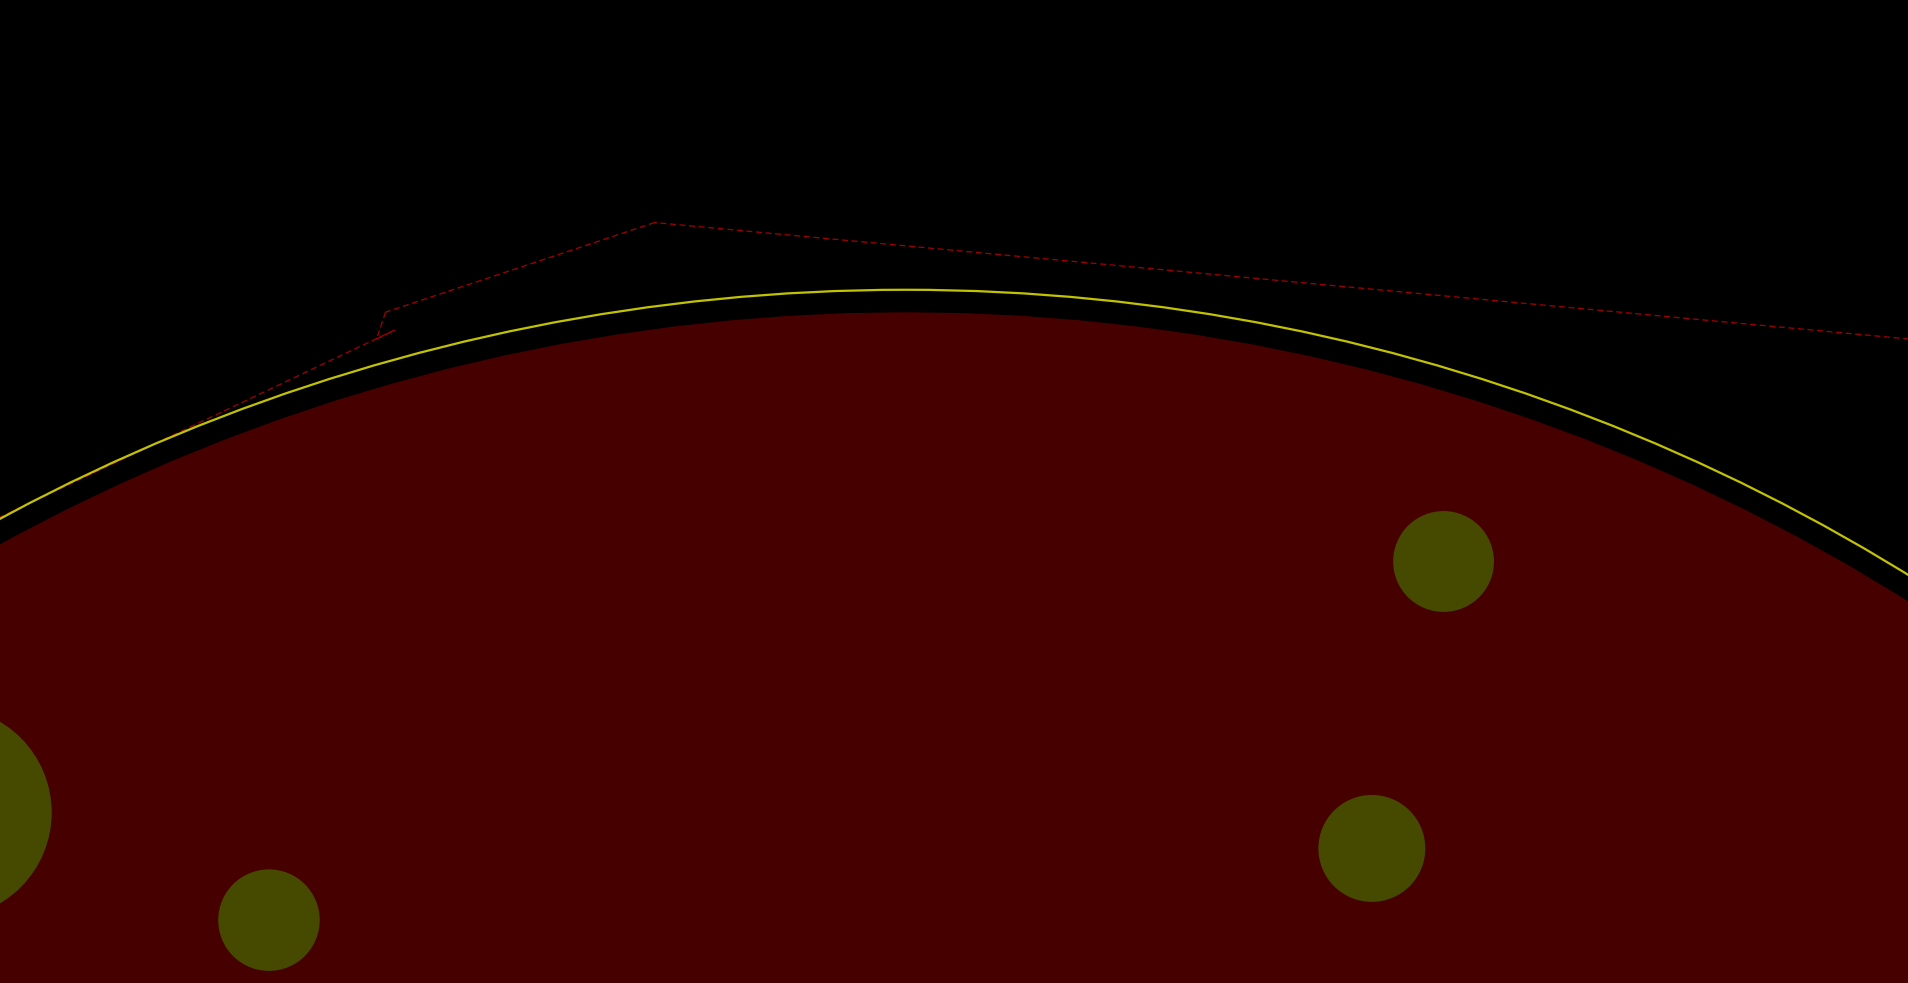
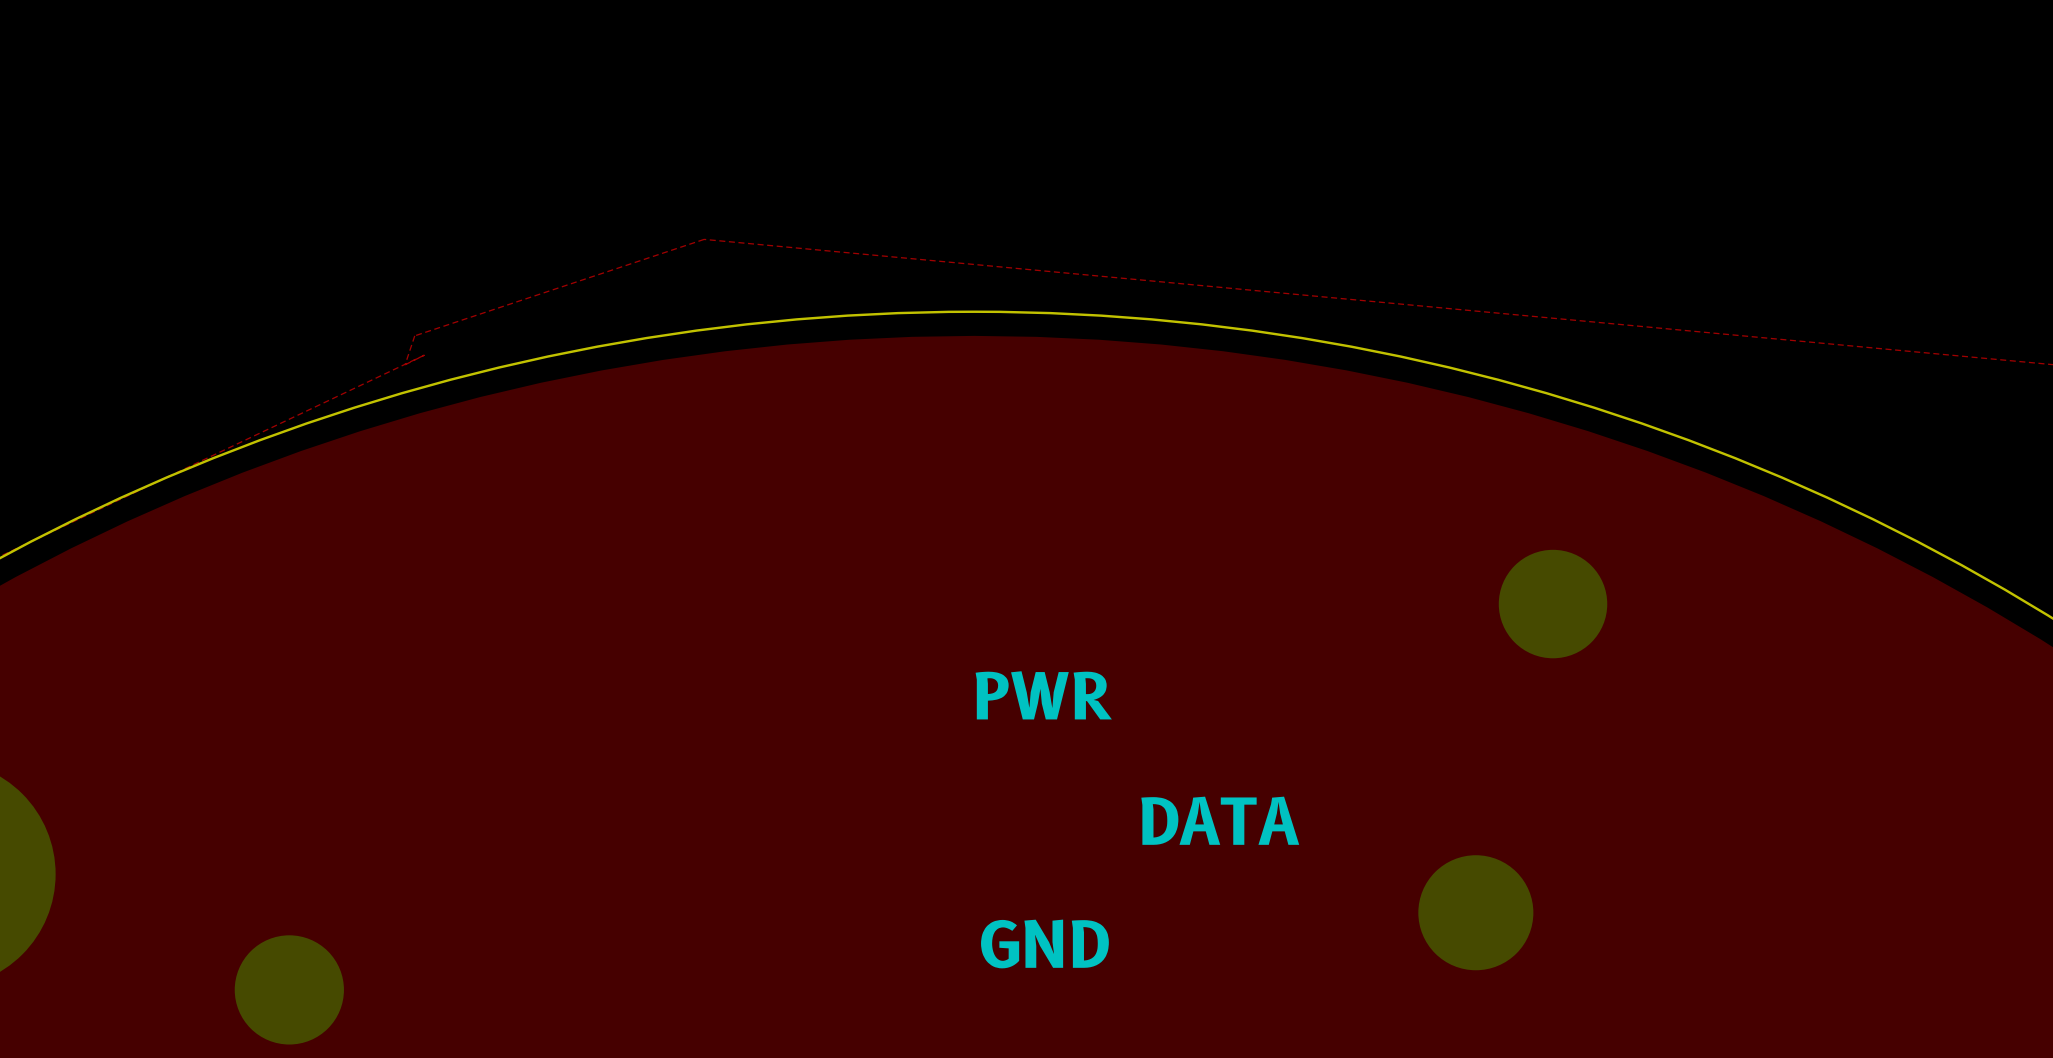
text: none -> PWR (1043, 695)
text: none -> DATA (1220, 820)
text: none -> GND (1044, 943)

